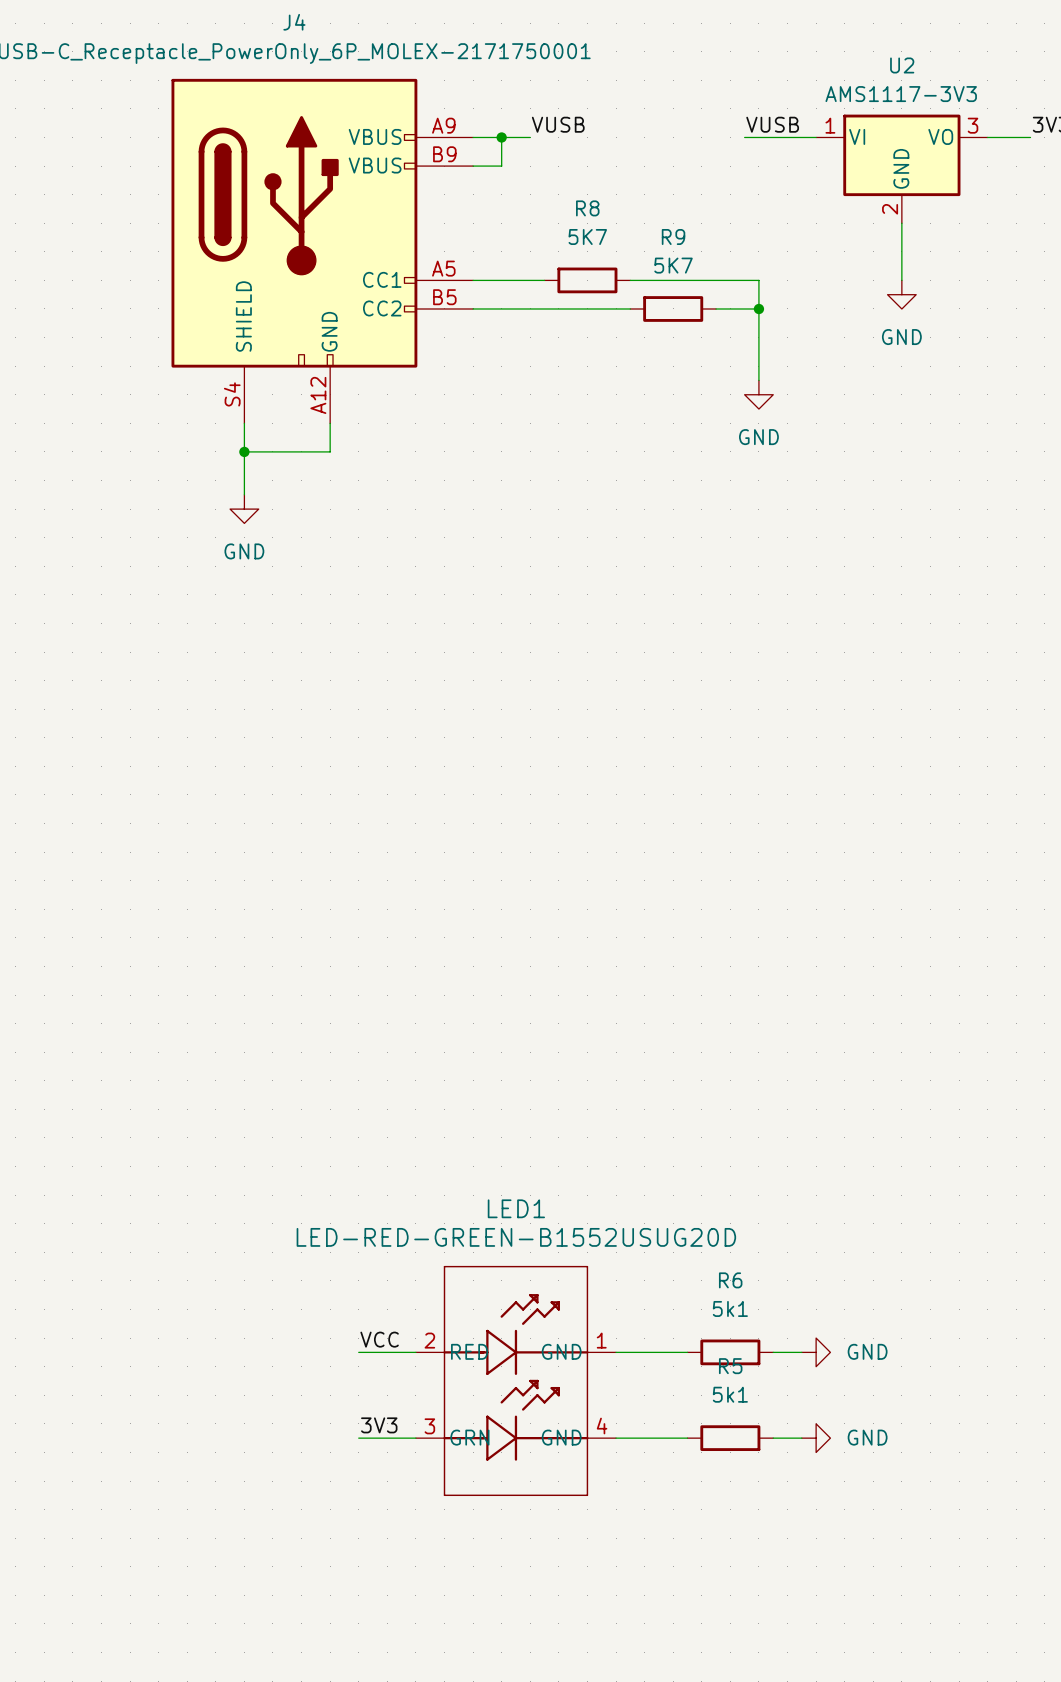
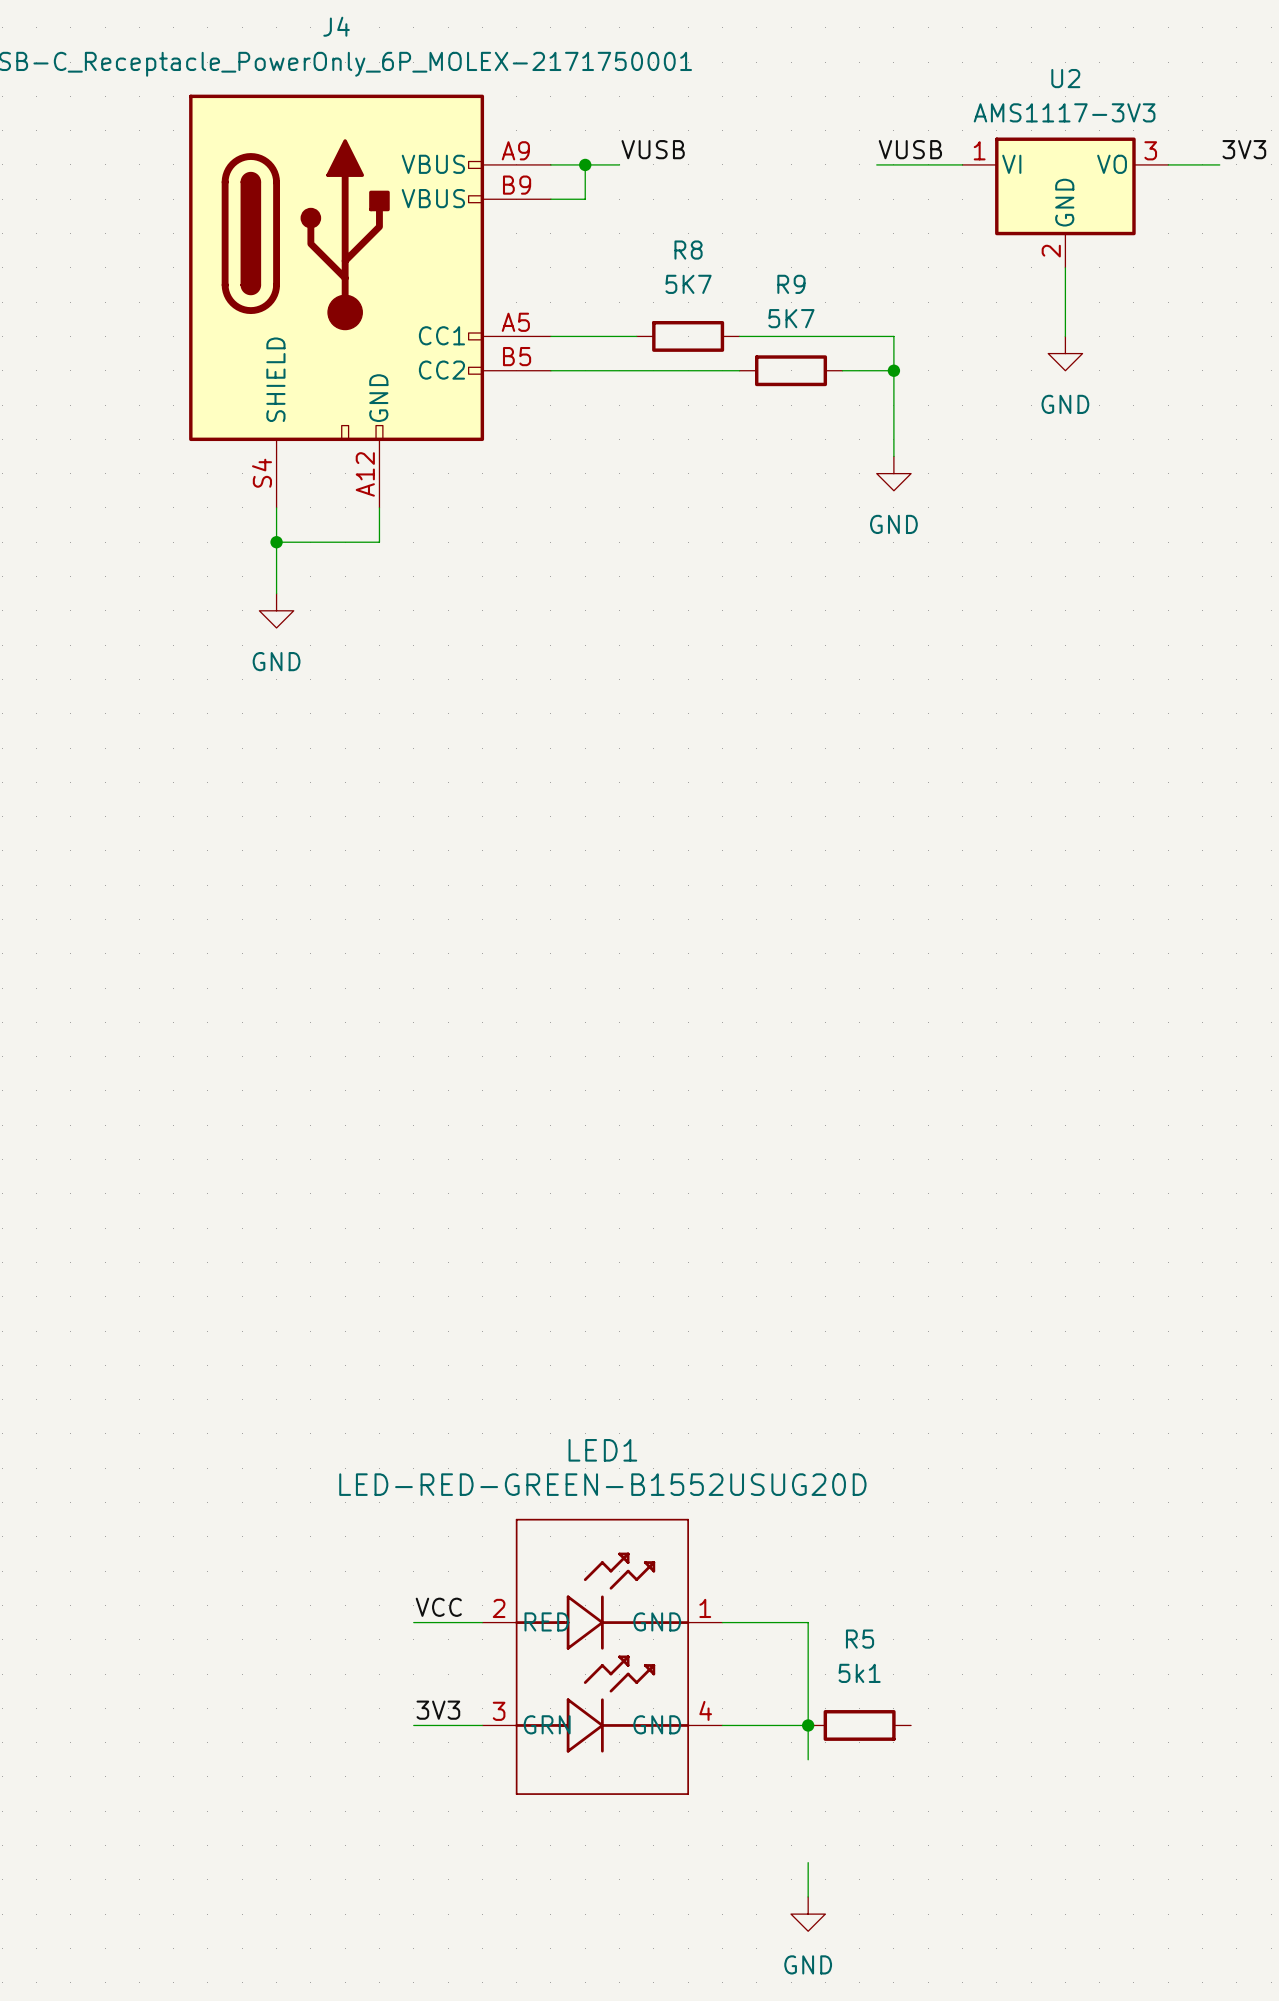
wire: none -> (808, 1622) (808, 1759)
R6: 5k1 (730, 1352) -> none
wire: (773, 1352) (801, 1352) -> none
power symbol: GND (816, 1352) -> none
junction: none -> (808, 1725)
wire: (773, 1438) (801, 1438) -> none
power symbol: GND (816, 1438) -> none
wire: none -> (808, 1862) (808, 1896)
power symbol: none -> GND (808, 1914)

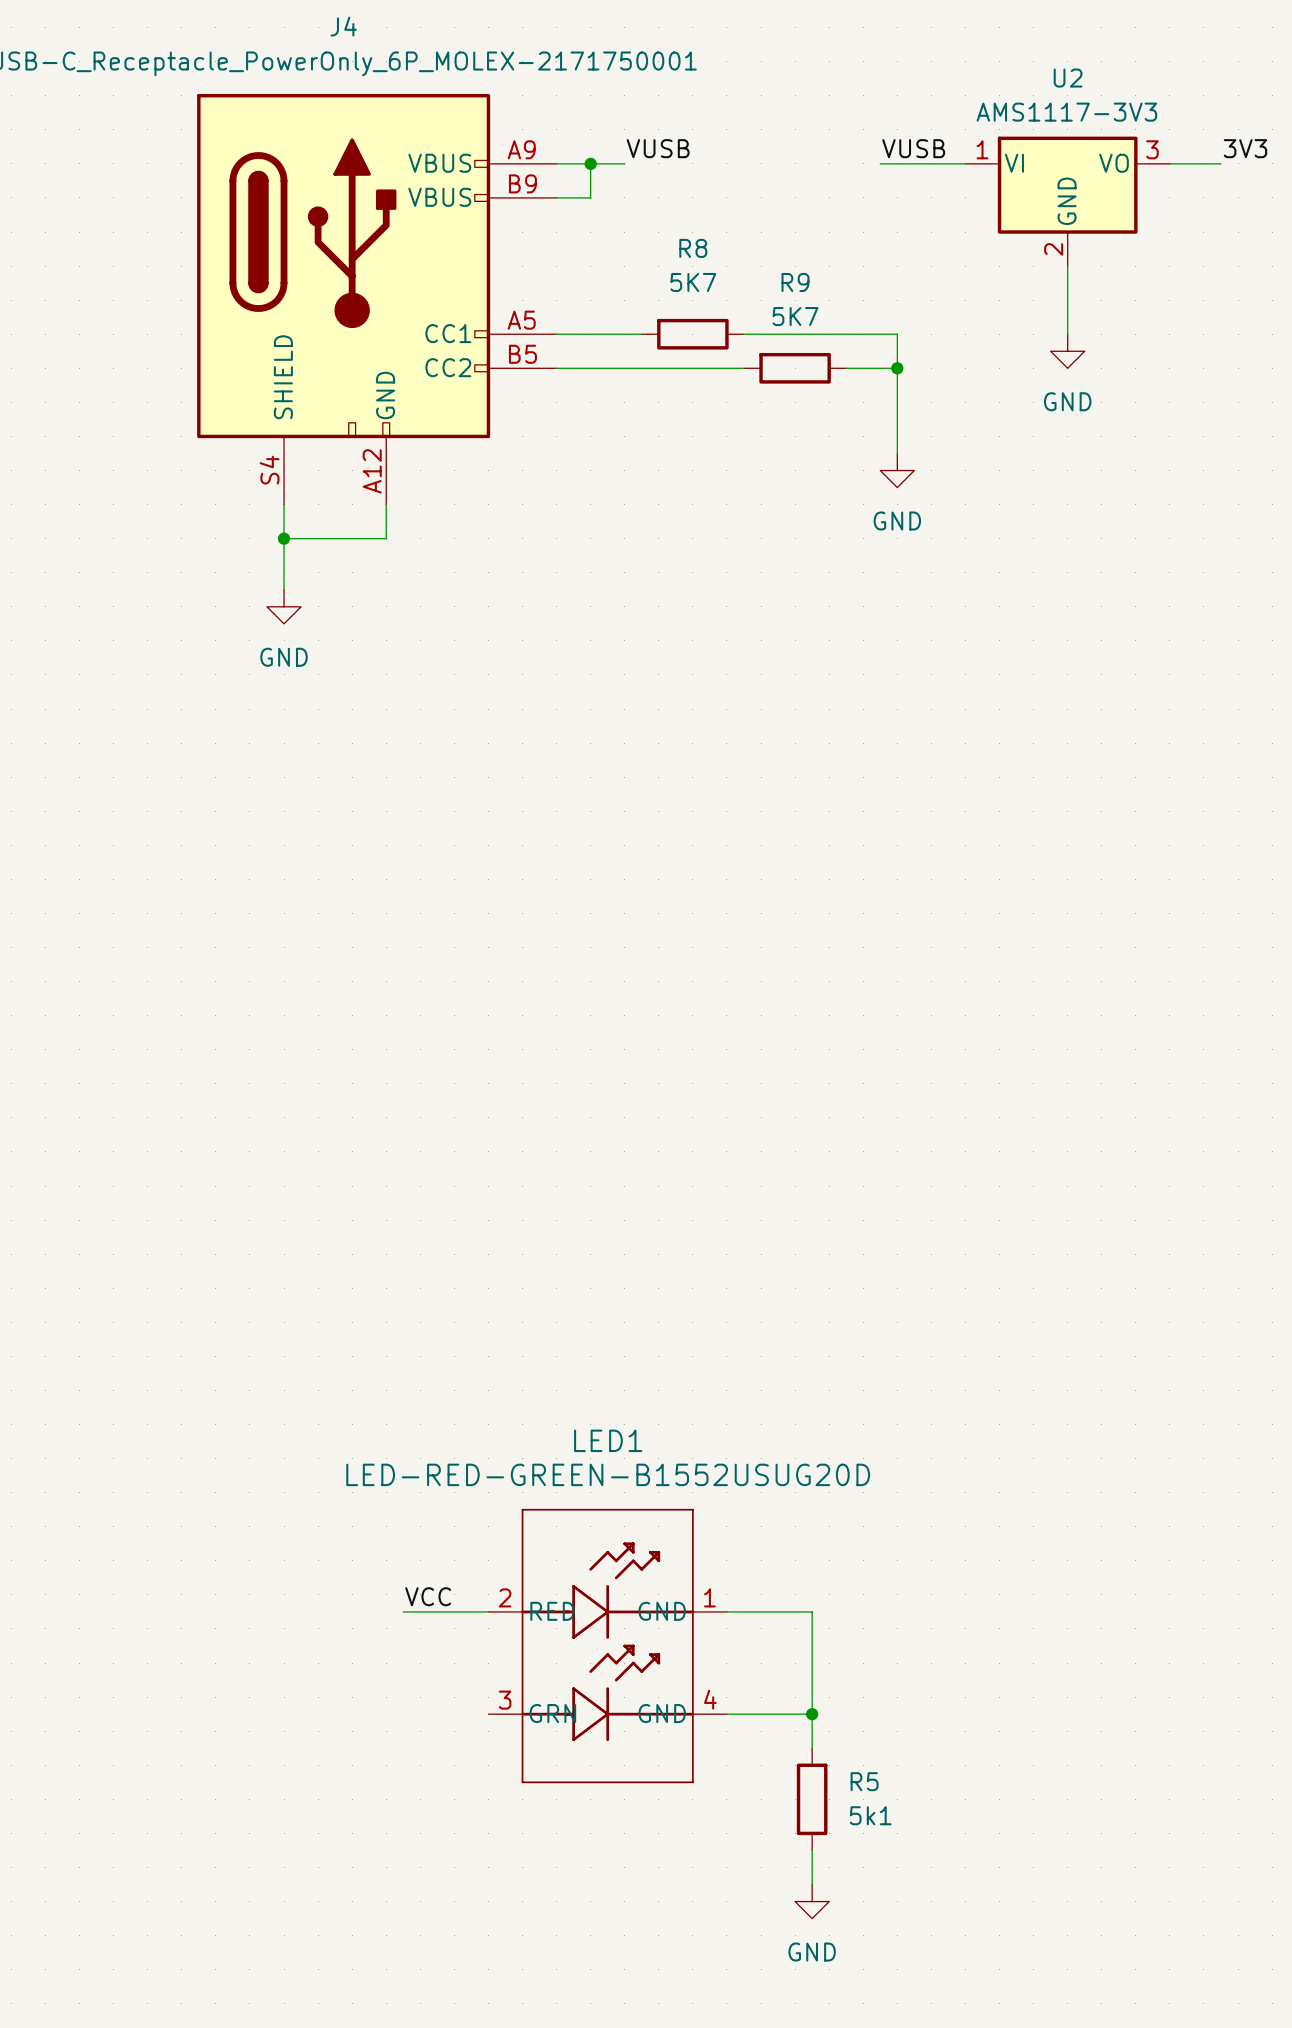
label position: VCC (438, 1607) -> VCC (428, 1596)
wire: none -> (403, 1611) (420, 1611)
R5 name position: R5 (860, 1639) -> R5 (864, 1781)
label: 3V3 (438, 1710) -> none
wire: (413, 1725) (482, 1725) -> none
R5 rotation: 0° (859, 1725) -> 90° clockwise (812, 1799)
R5 position: (859, 1725) -> (812, 1799)

